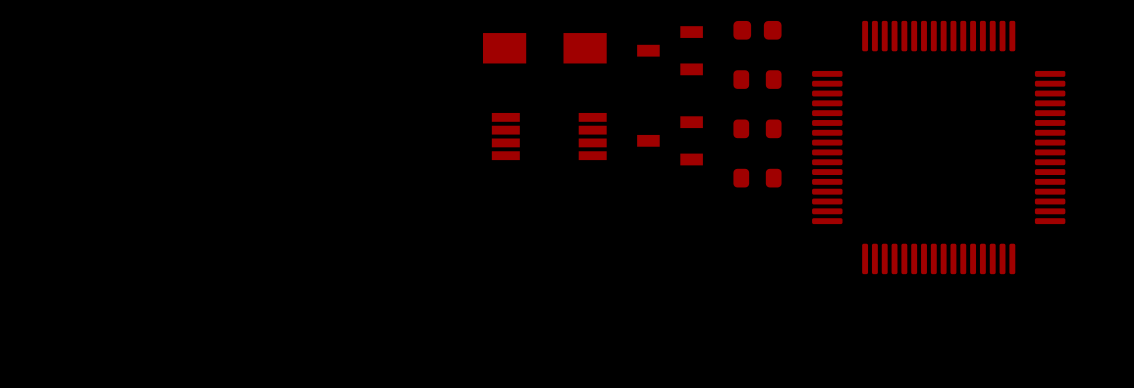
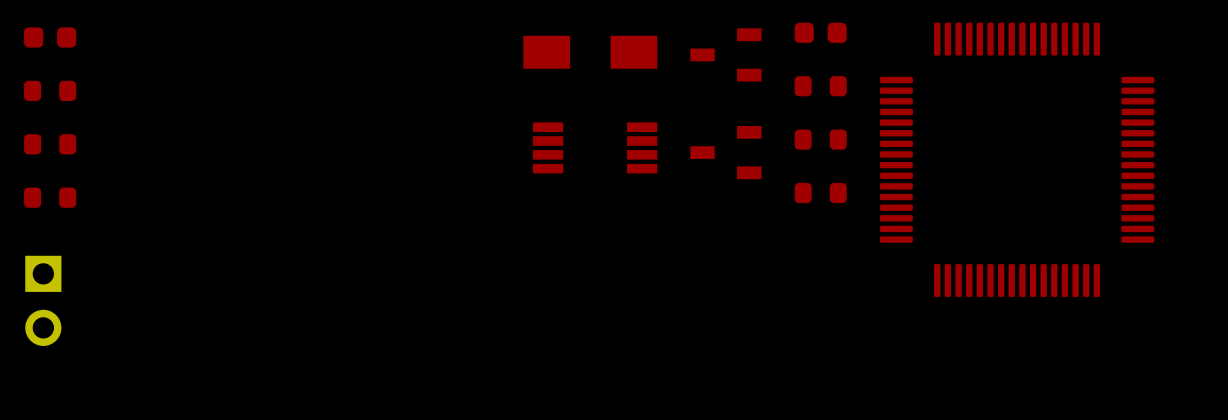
part: none -> (50, 37)
part: none -> (50, 90)
part: none -> (50, 144)
part: none -> (50, 197)
part: none -> (43, 300)

